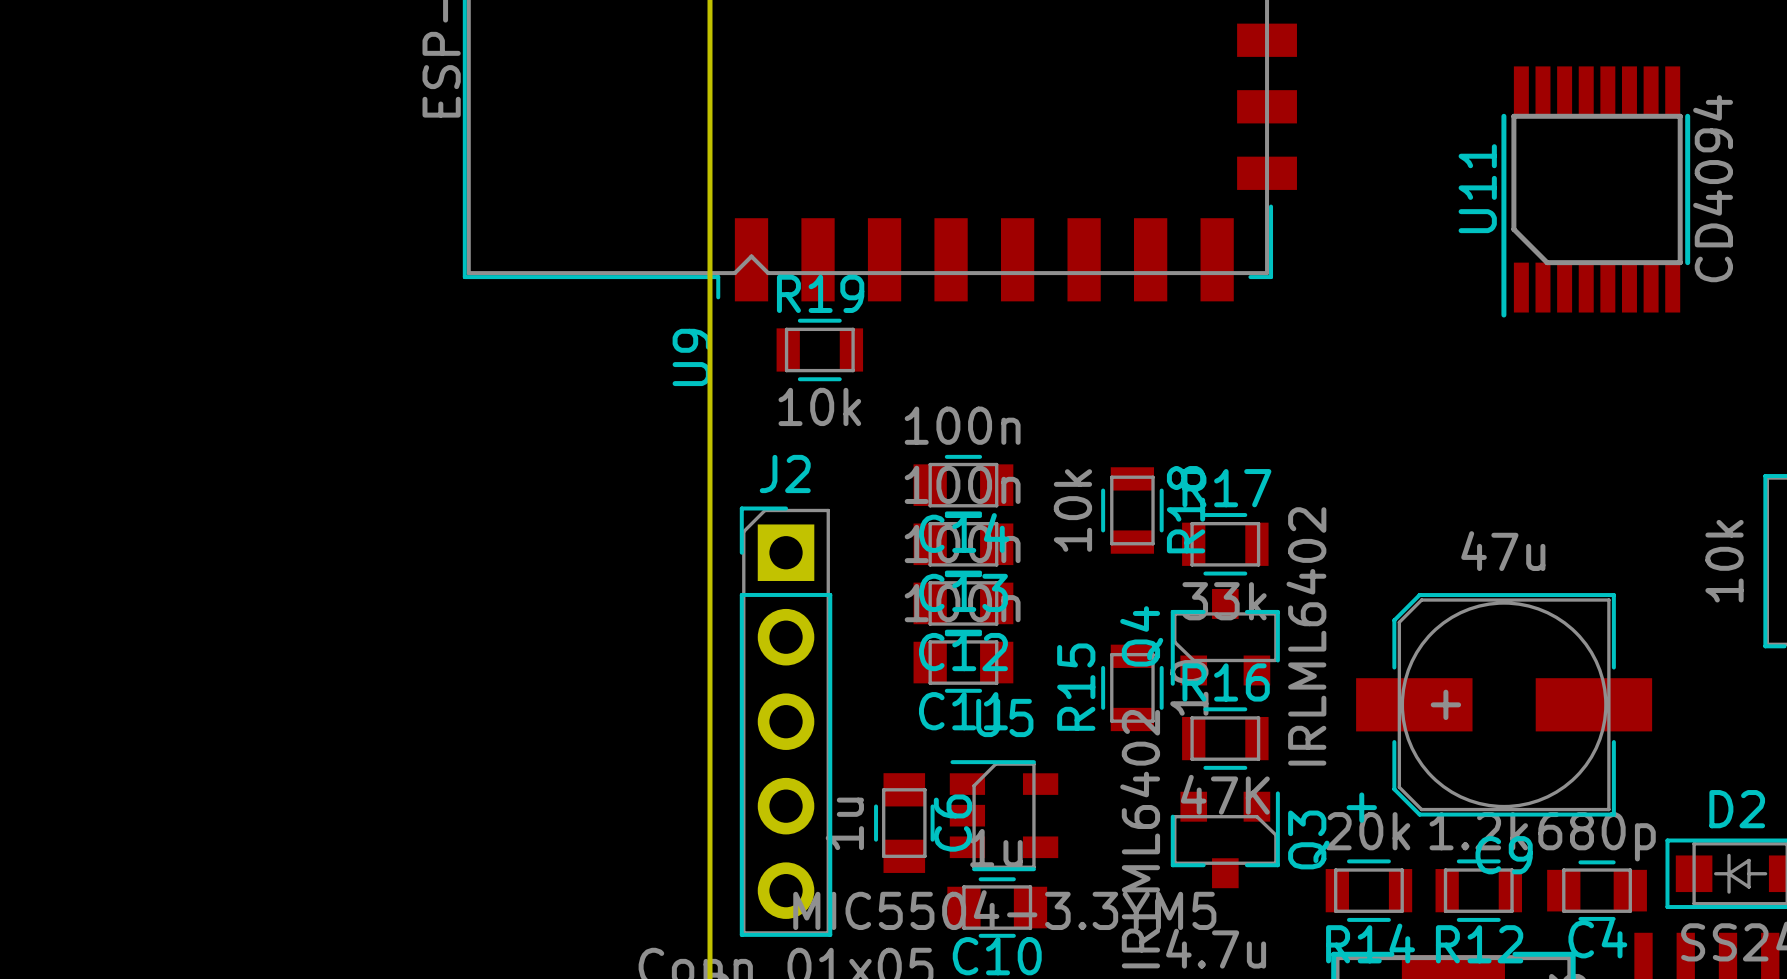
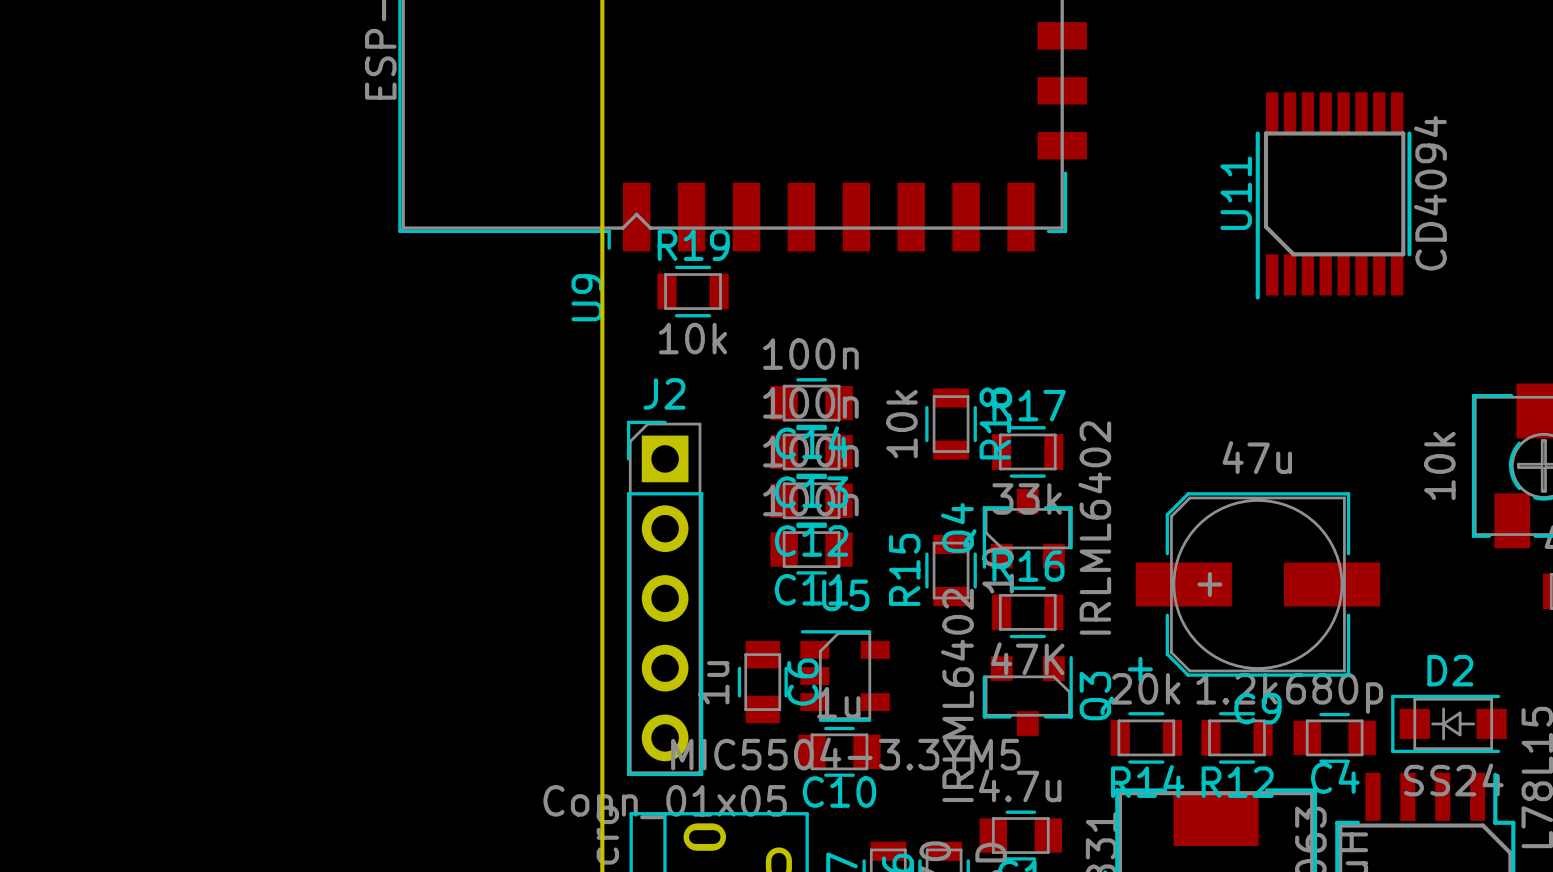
U11 position: (1595, 191) -> (1333, 195)

